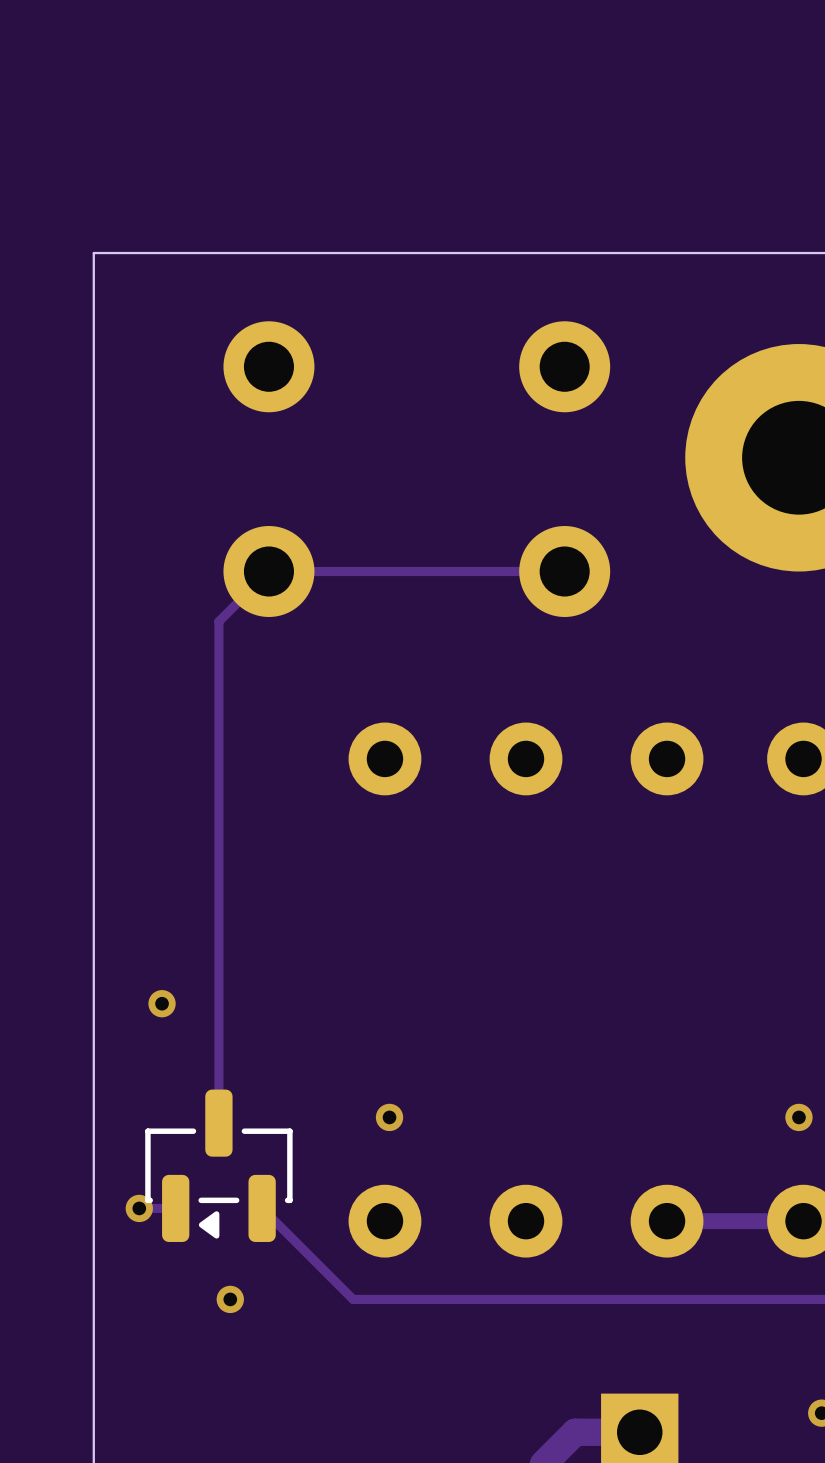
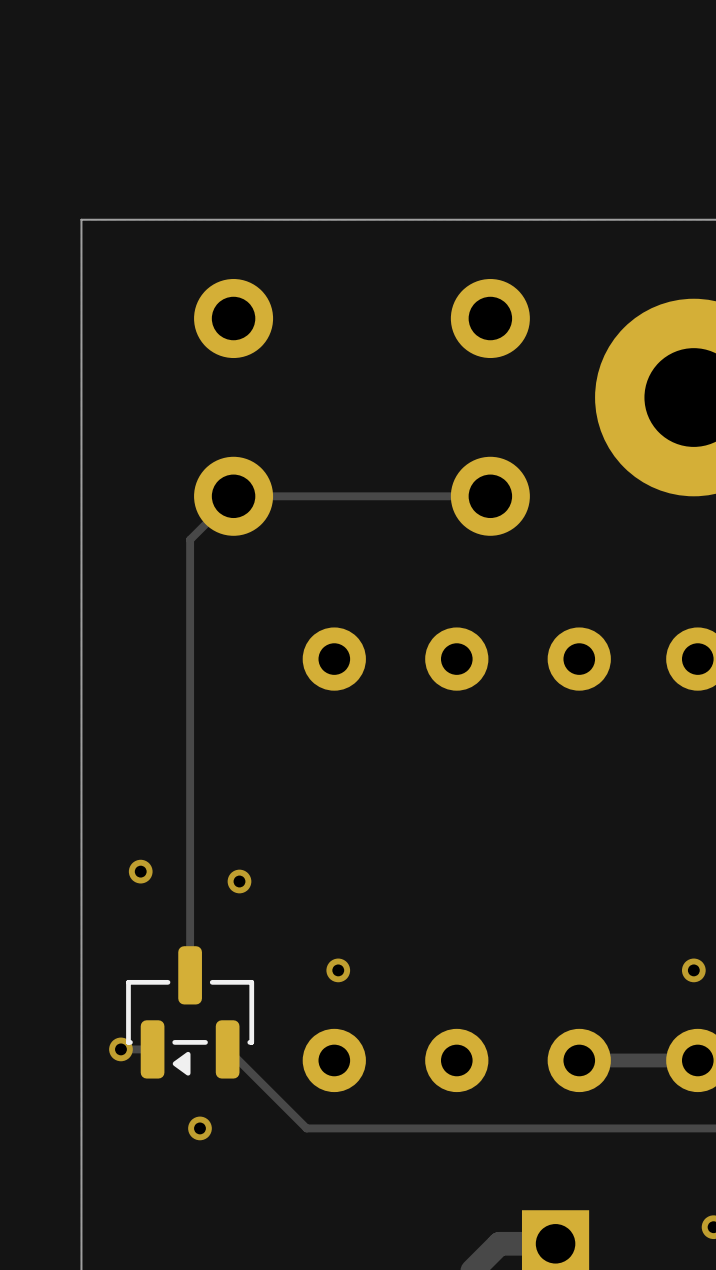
via: none -> (239, 881)

